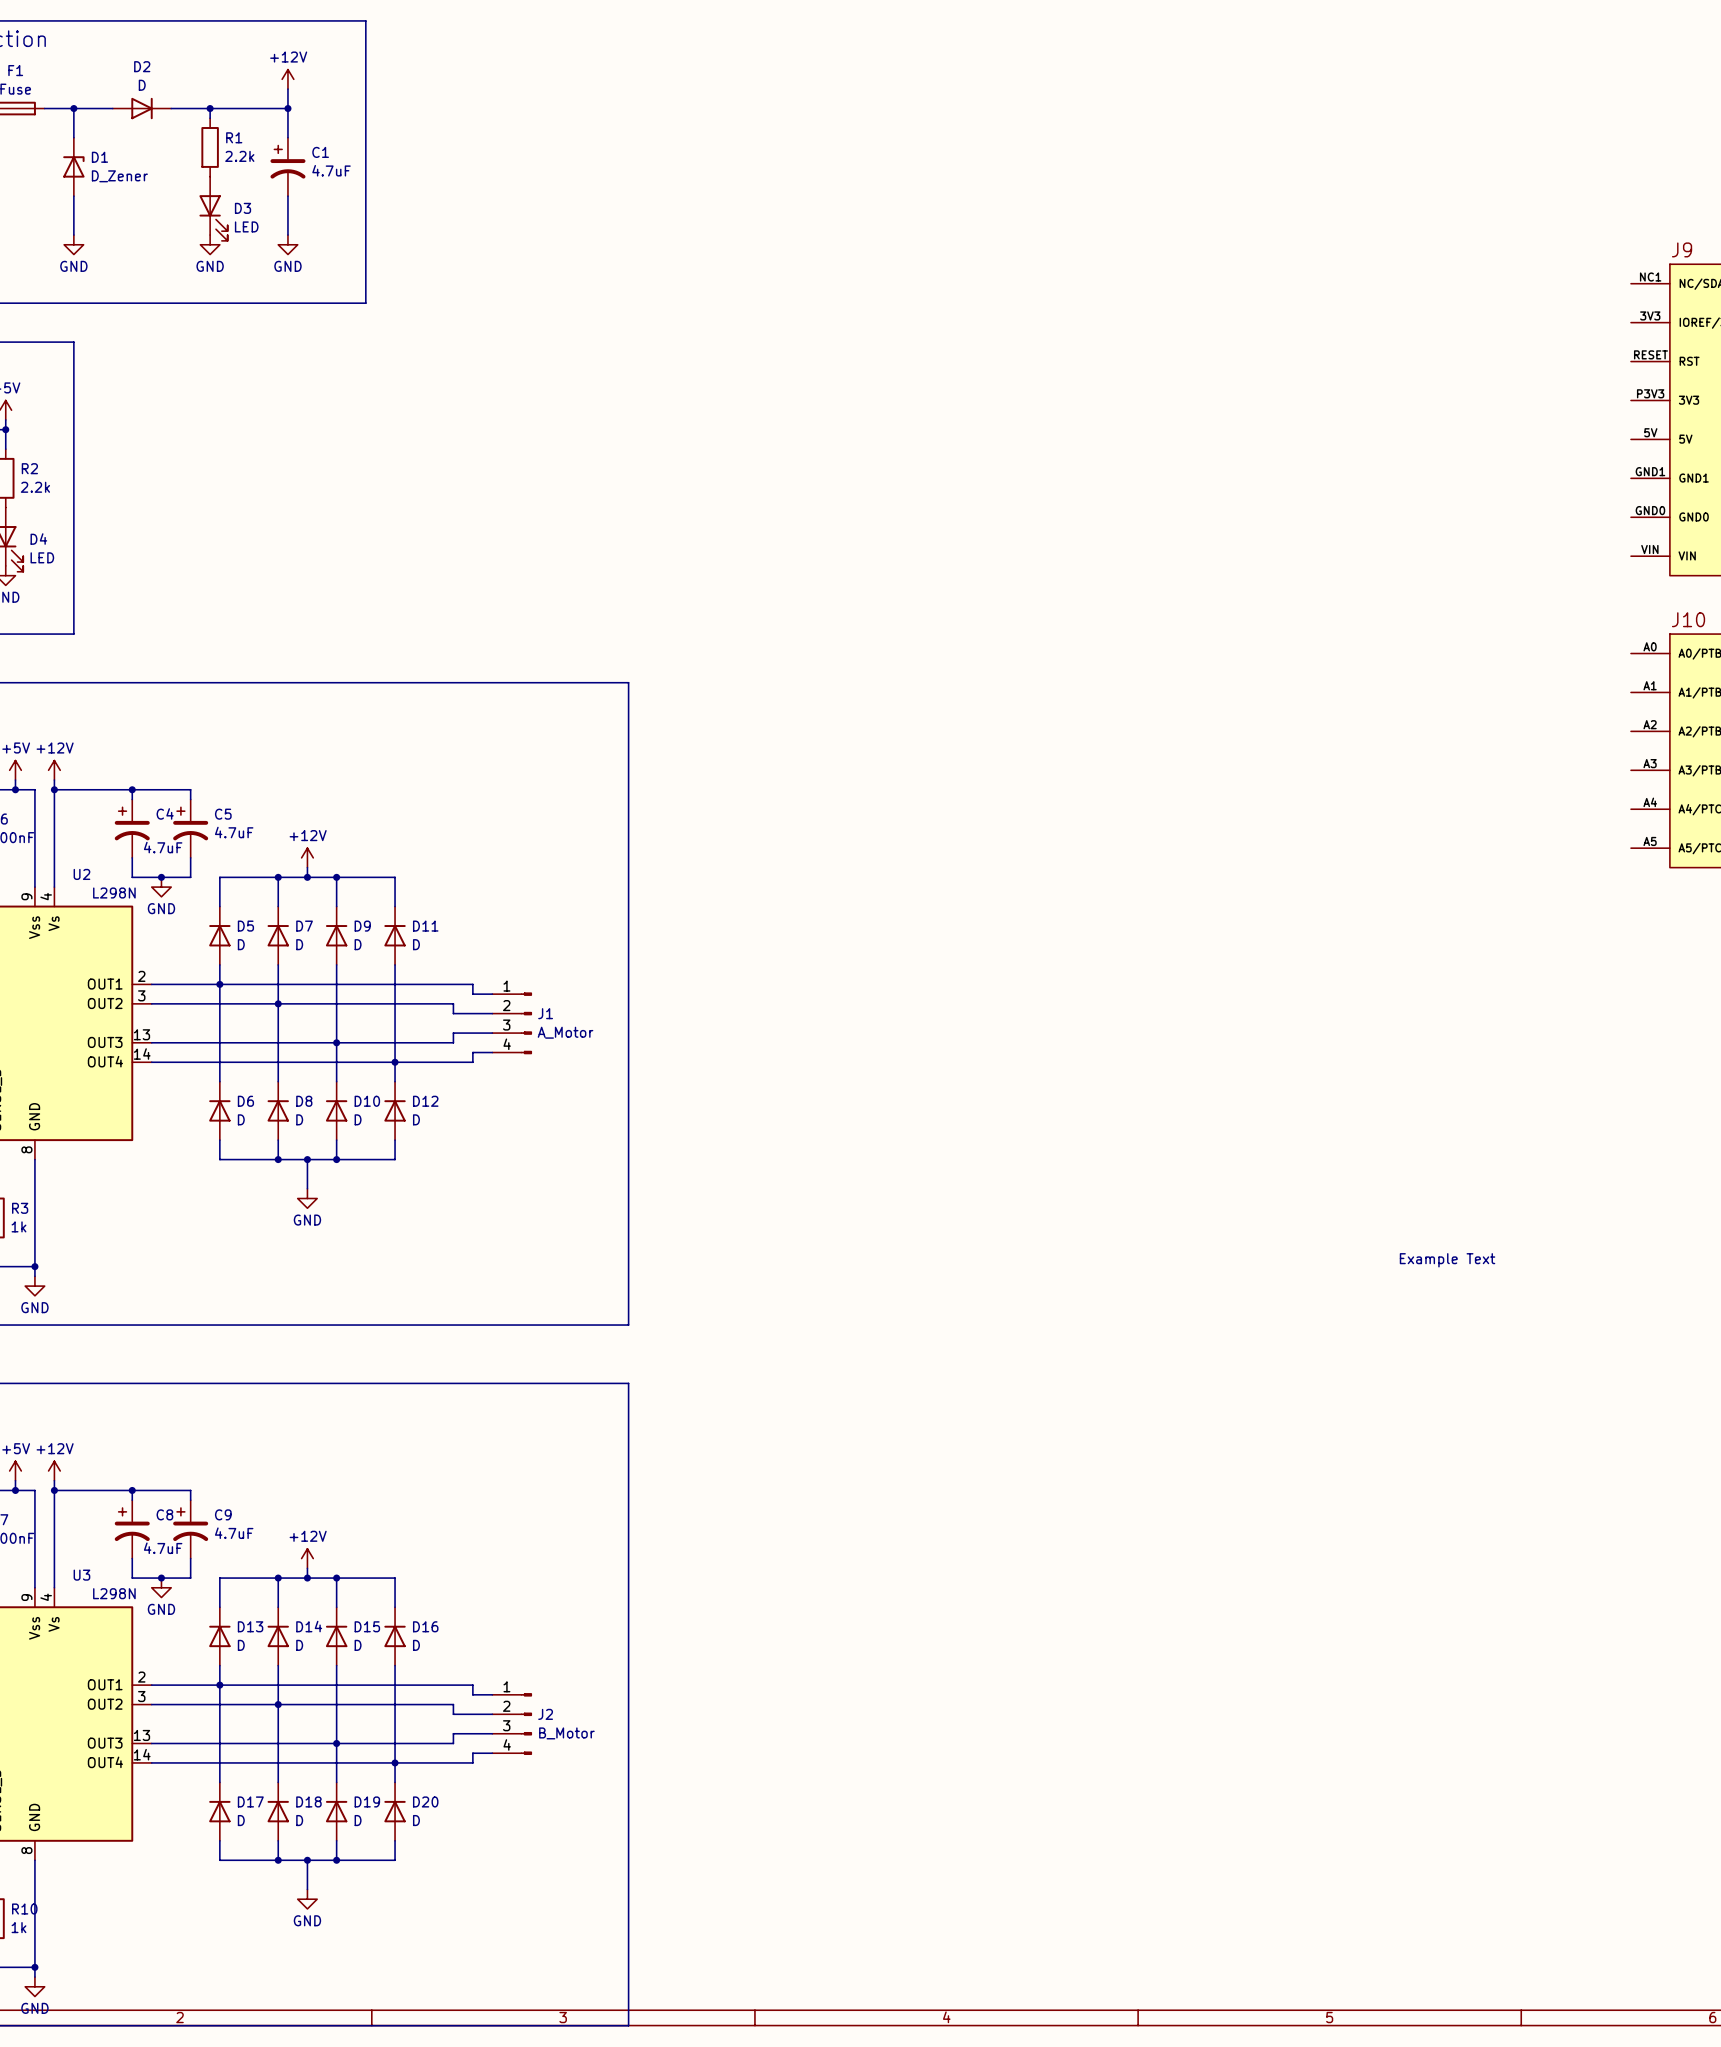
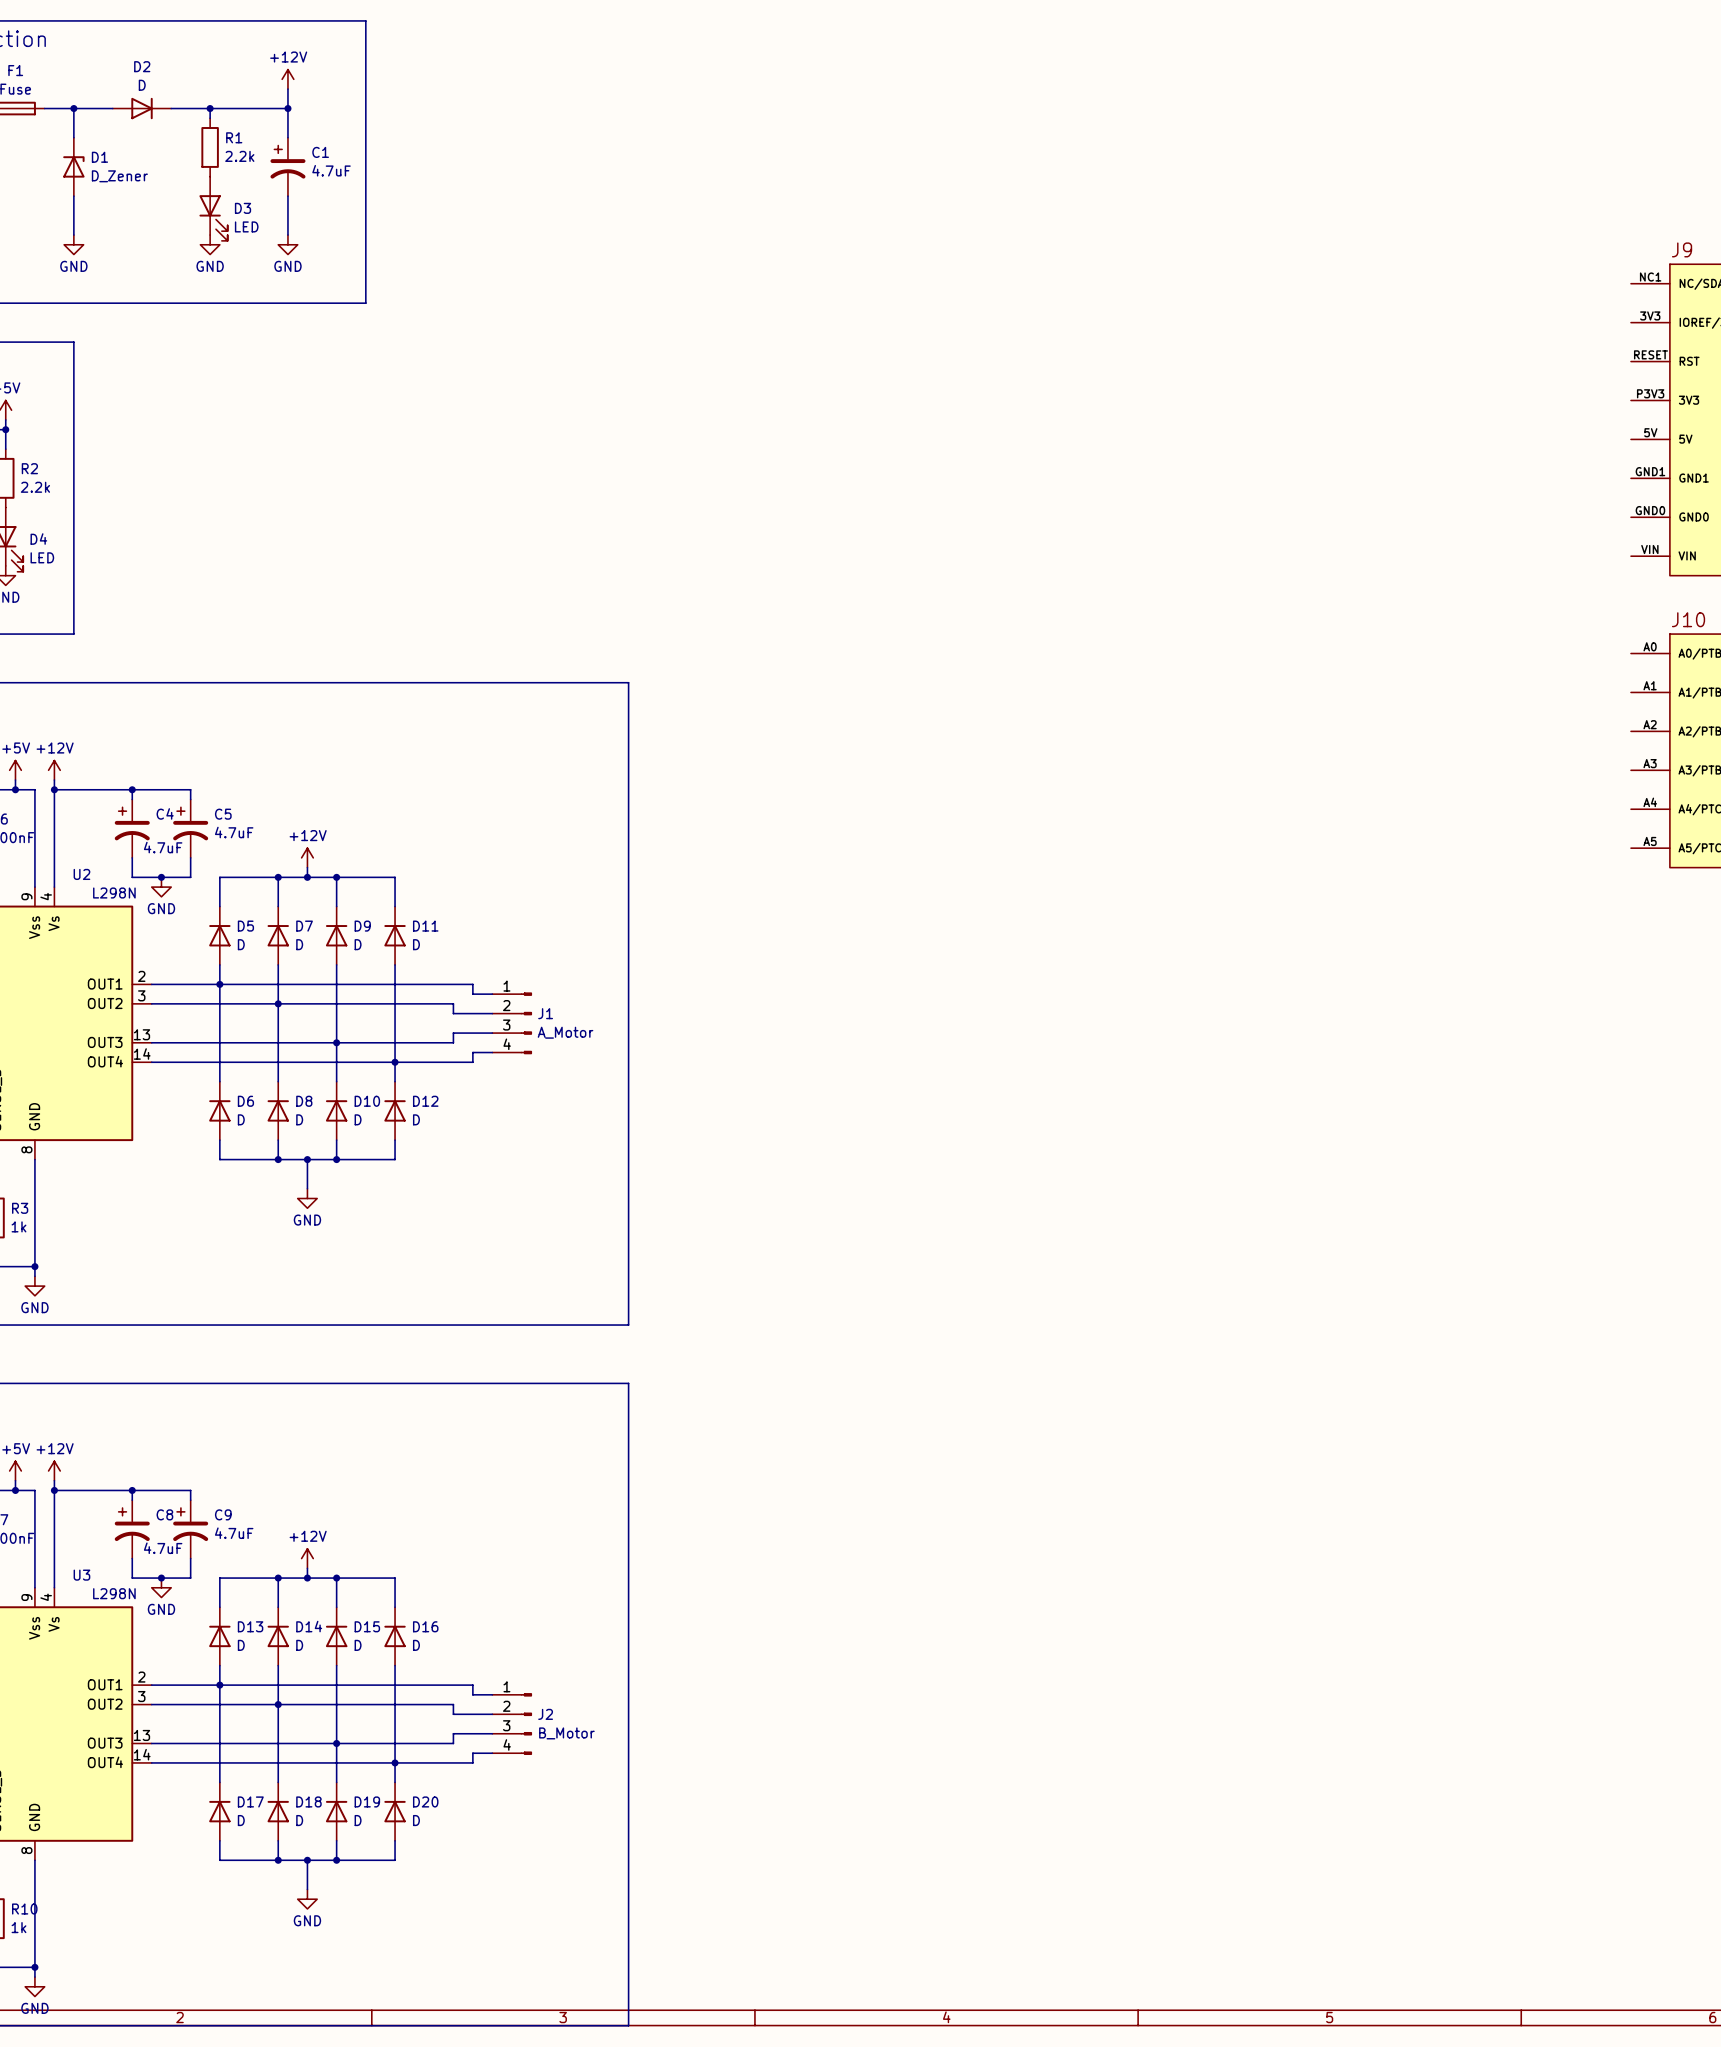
text: Example Text (1447, 1260) -> none

